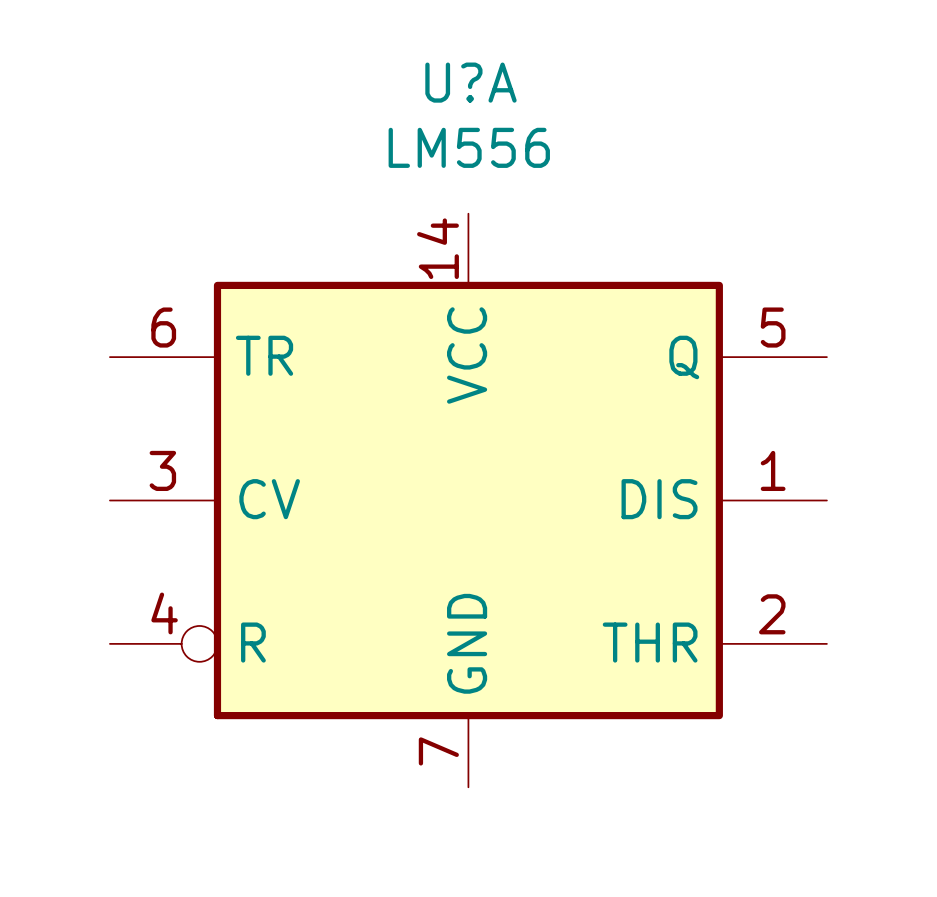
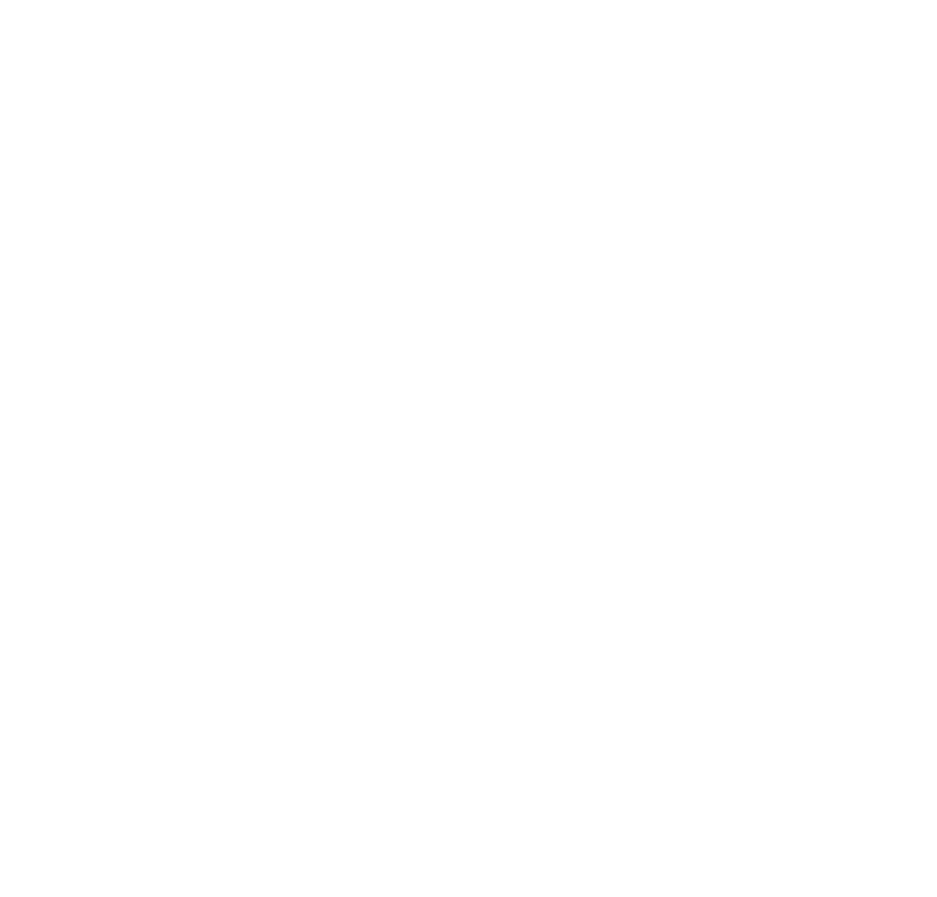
U?A: LM556 (468, 500) -> none

